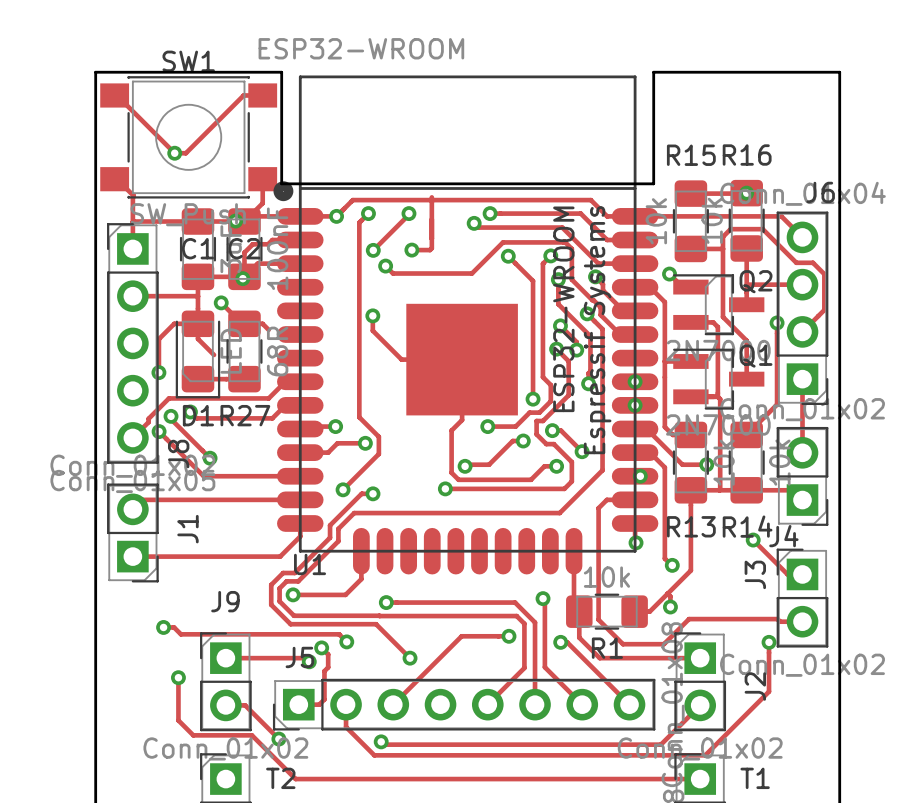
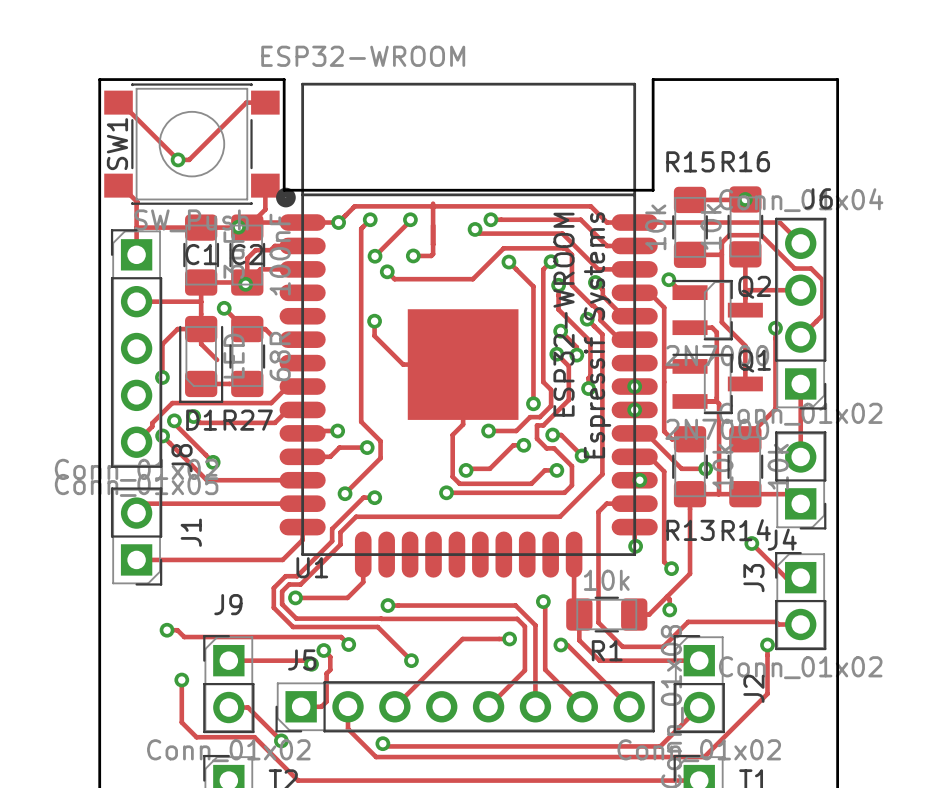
SW1 name rotation: 0° (188, 61) -> 90° counterclockwise (117, 144)
SW1 name position: SW1 (188, 61) -> SW1 (117, 144)

